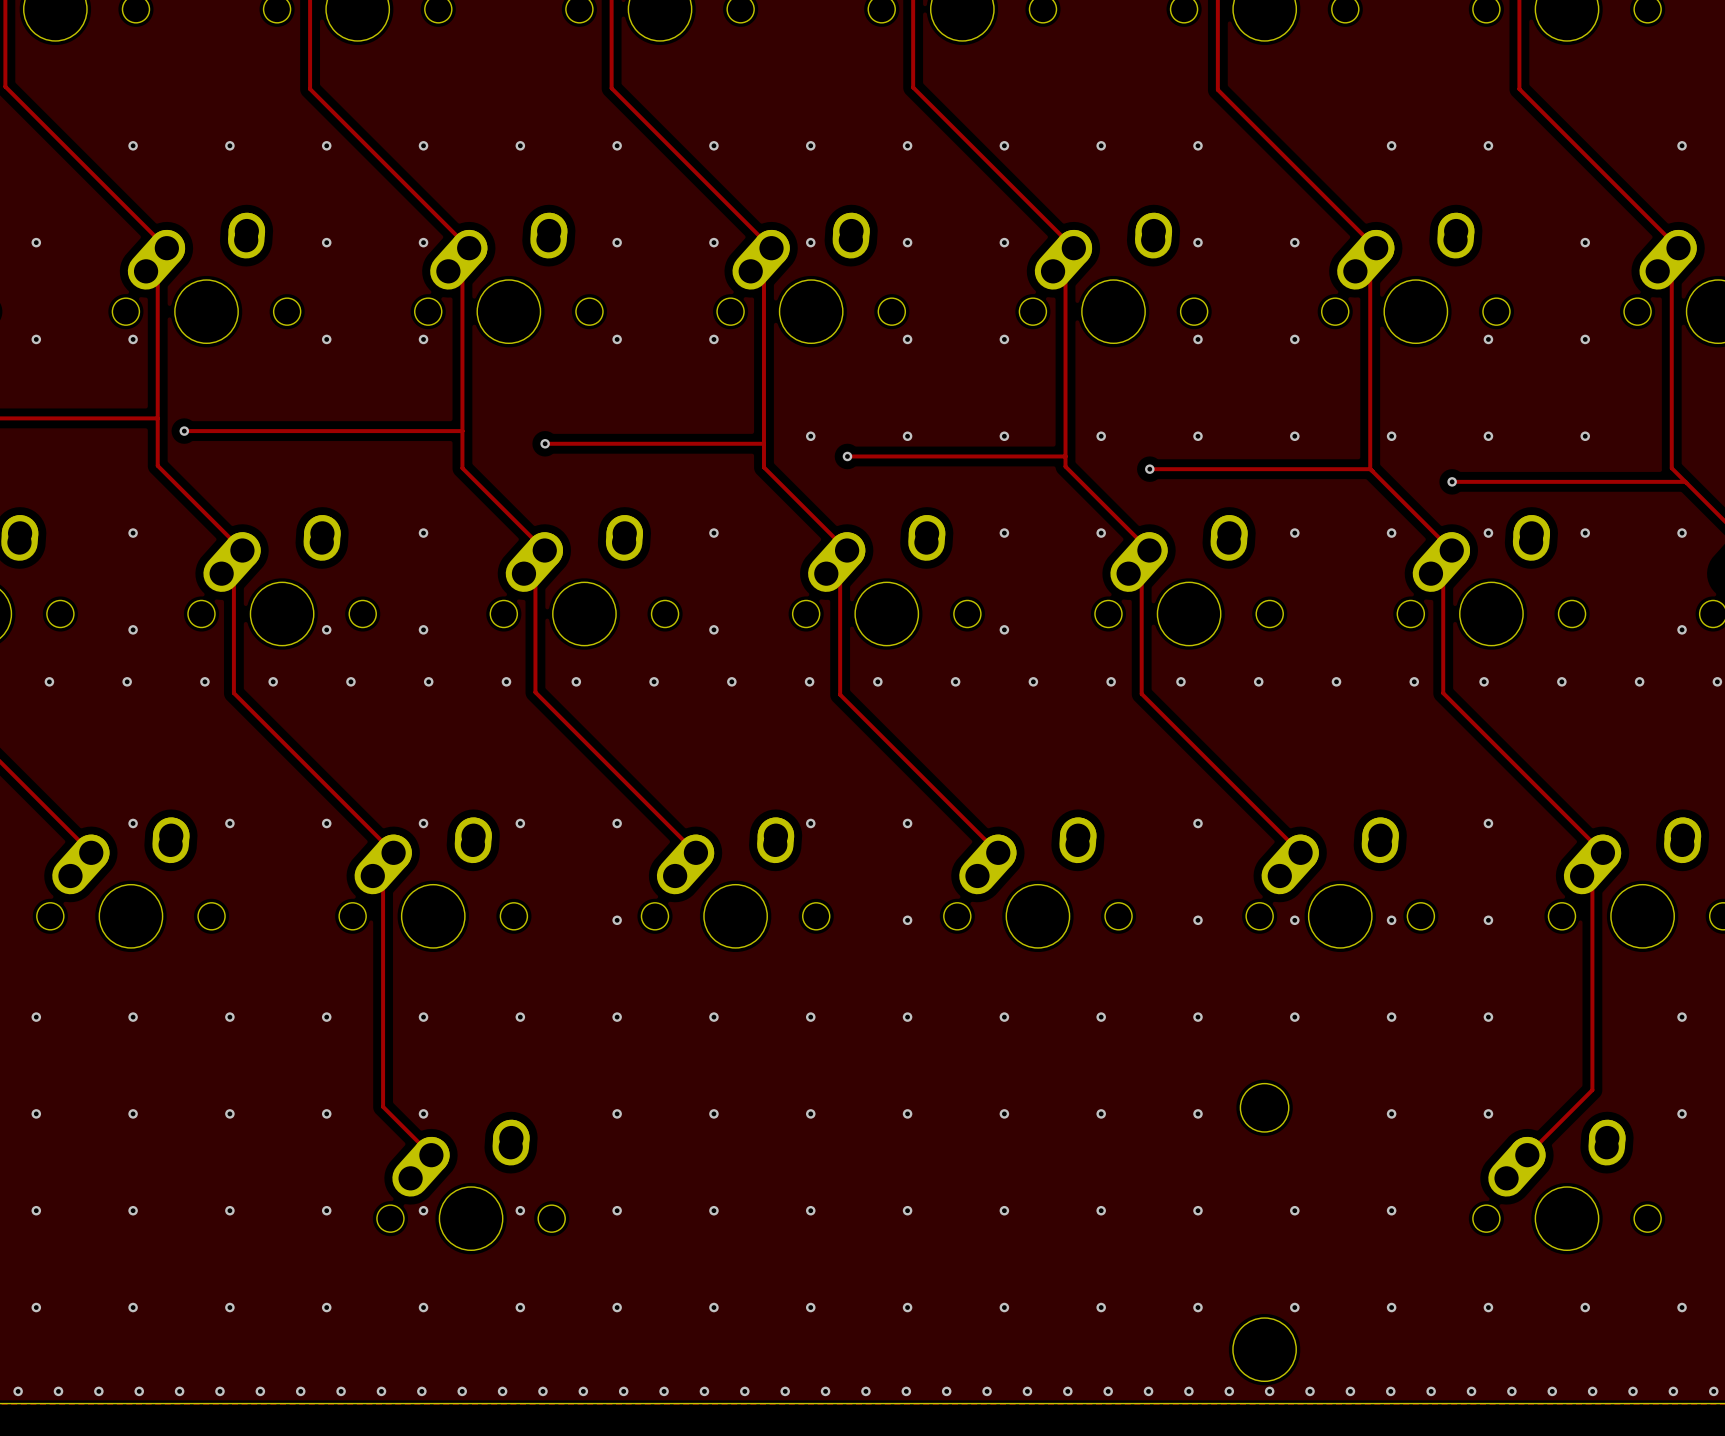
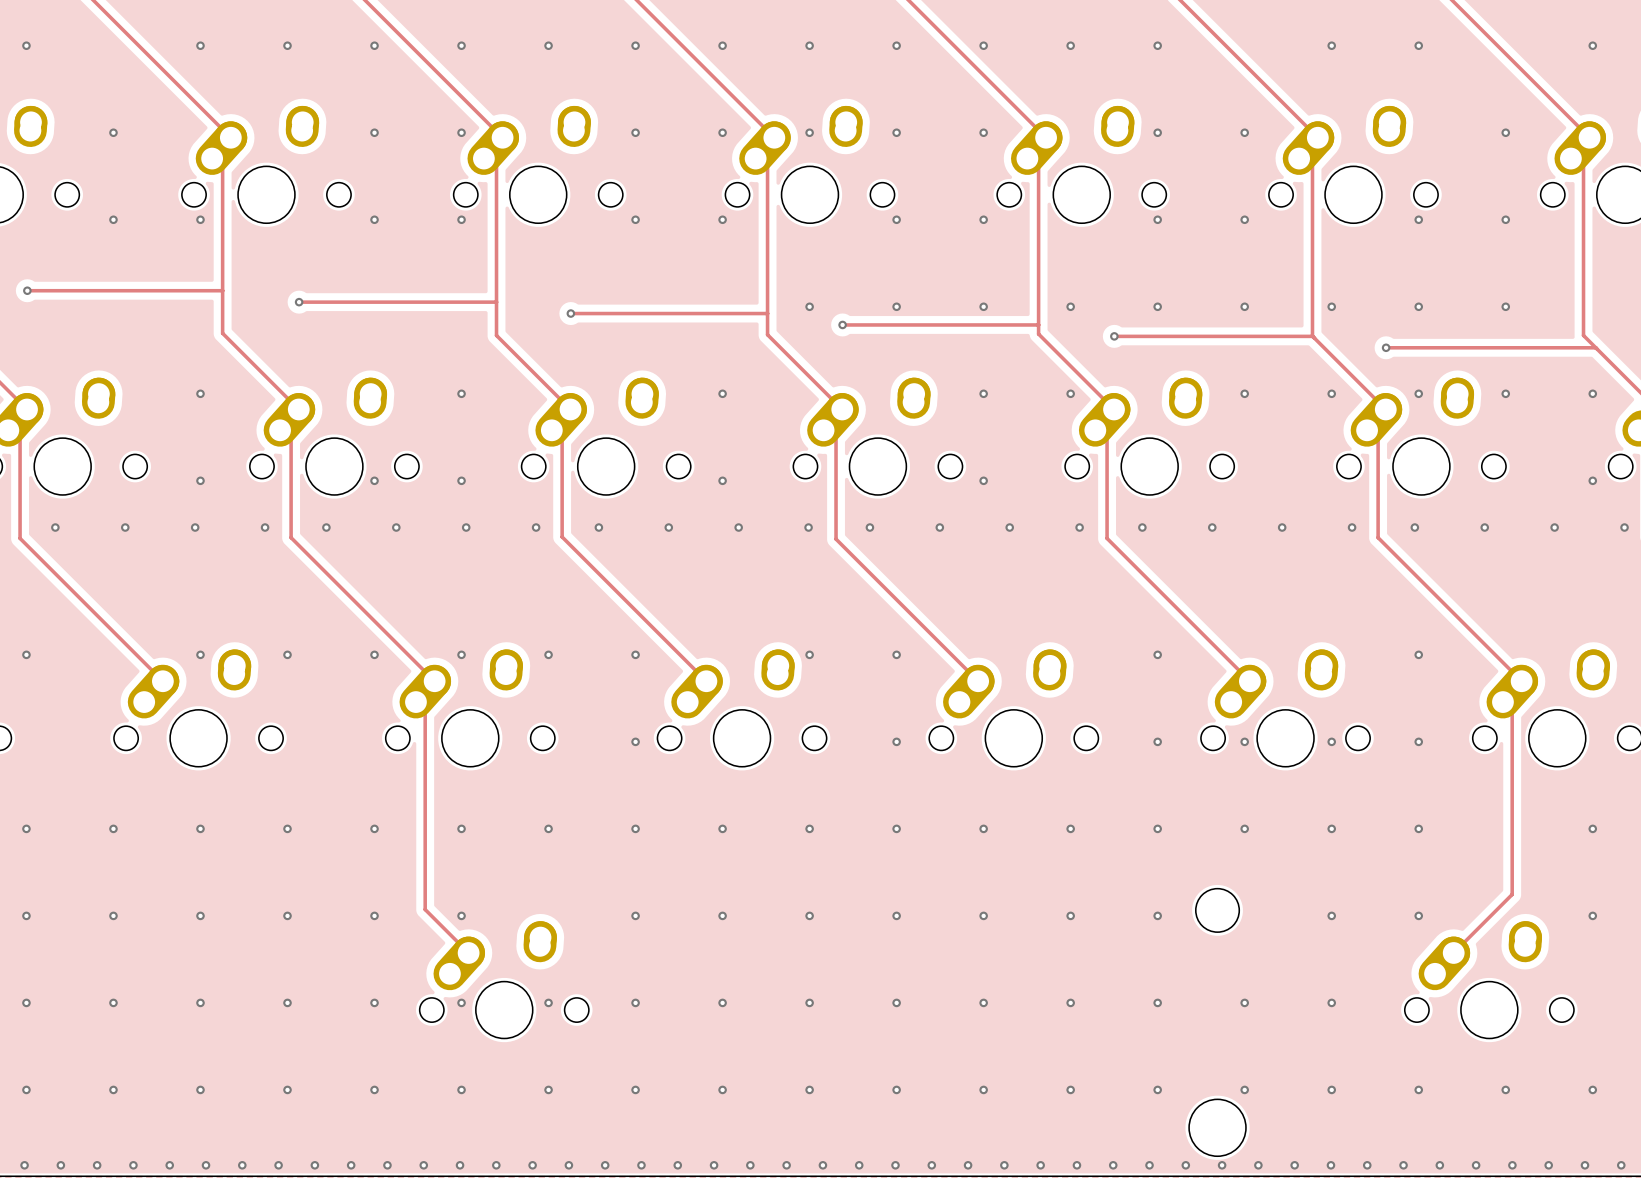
track: (184, 431) (242, 431) -> none
via position: (184, 431) -> (299, 302)

